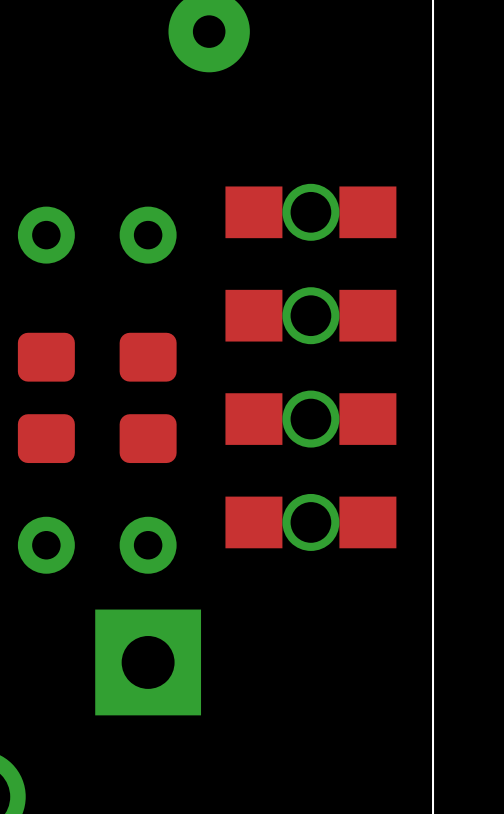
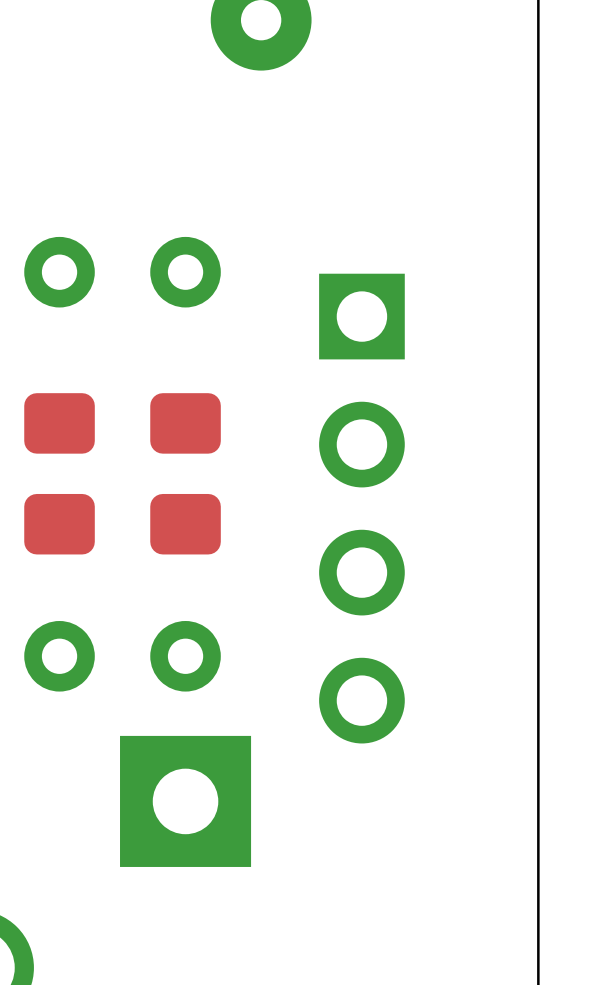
part: (310, 367) -> none
part: none -> (361, 508)

